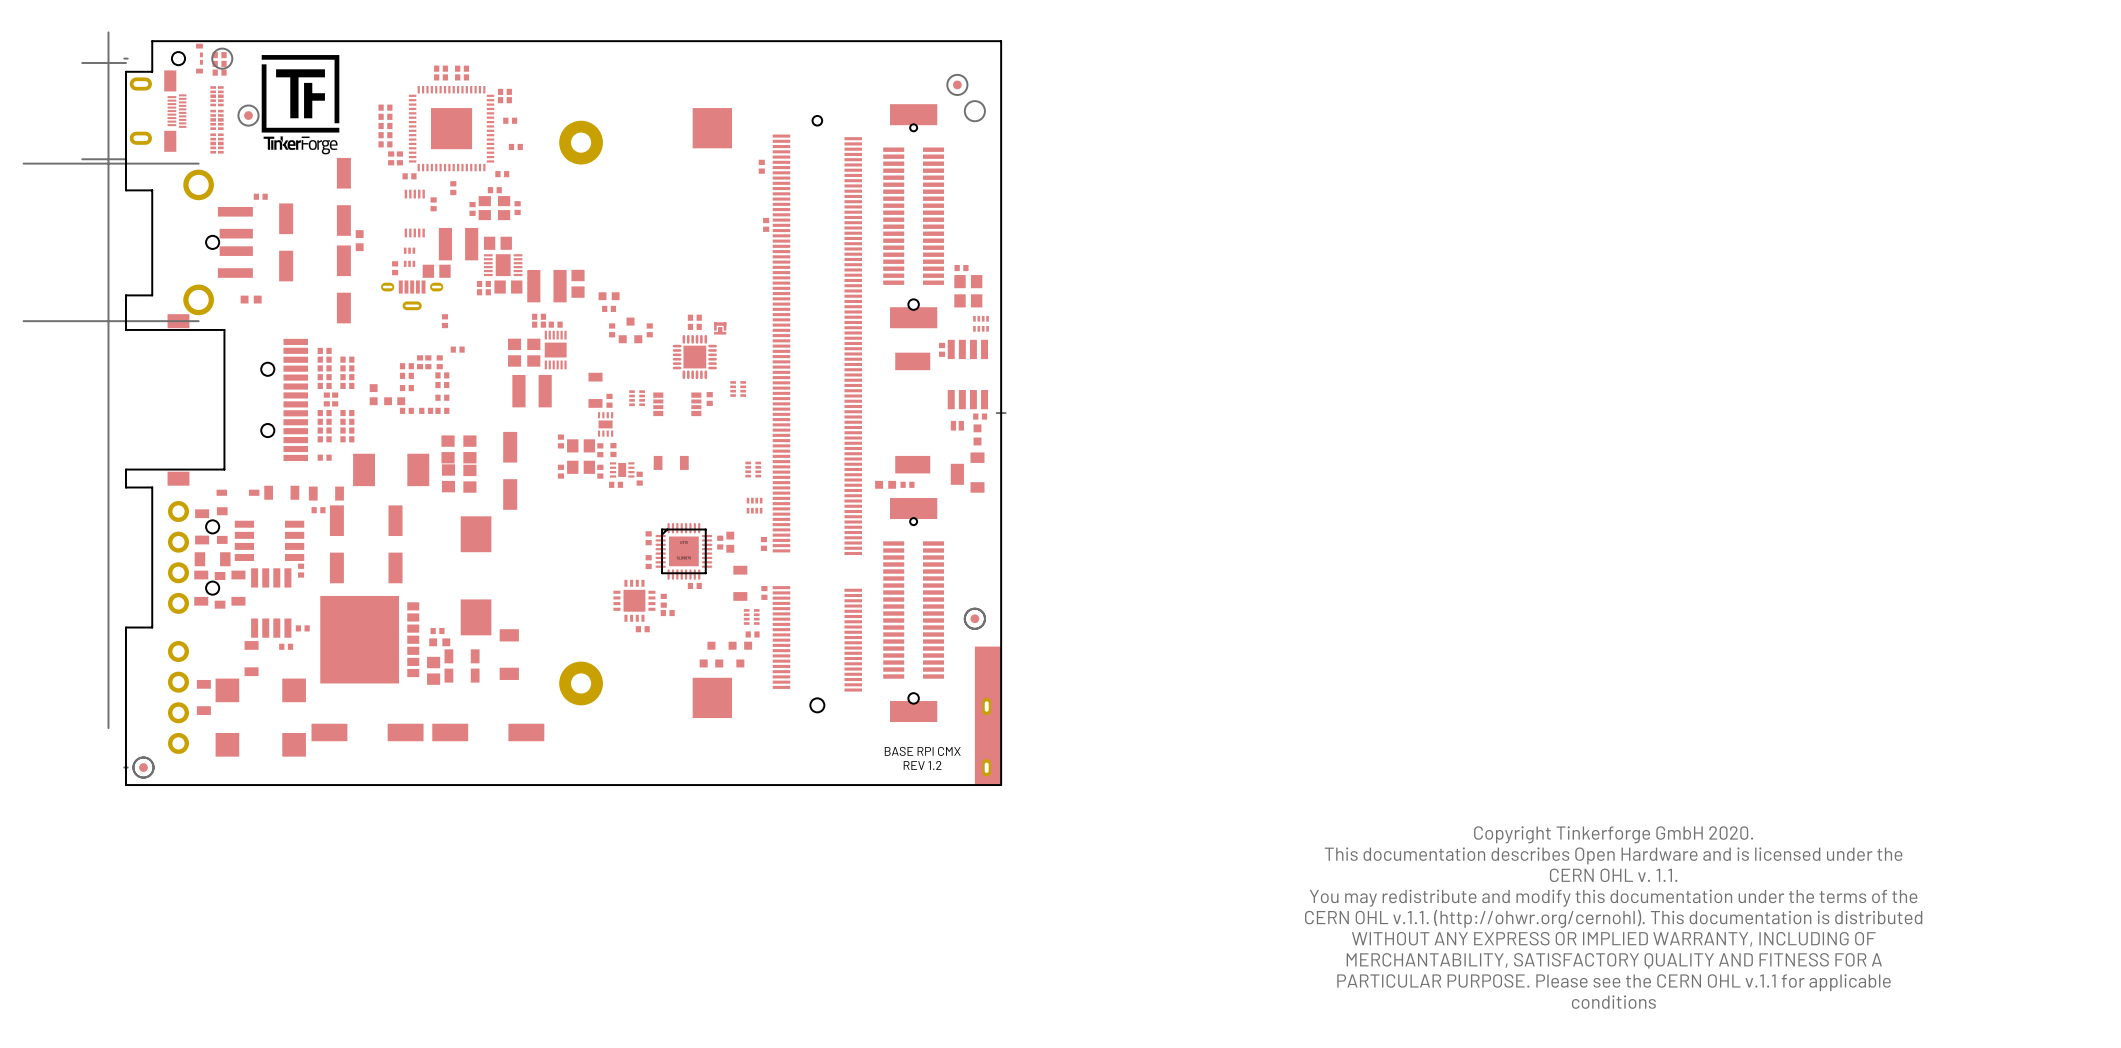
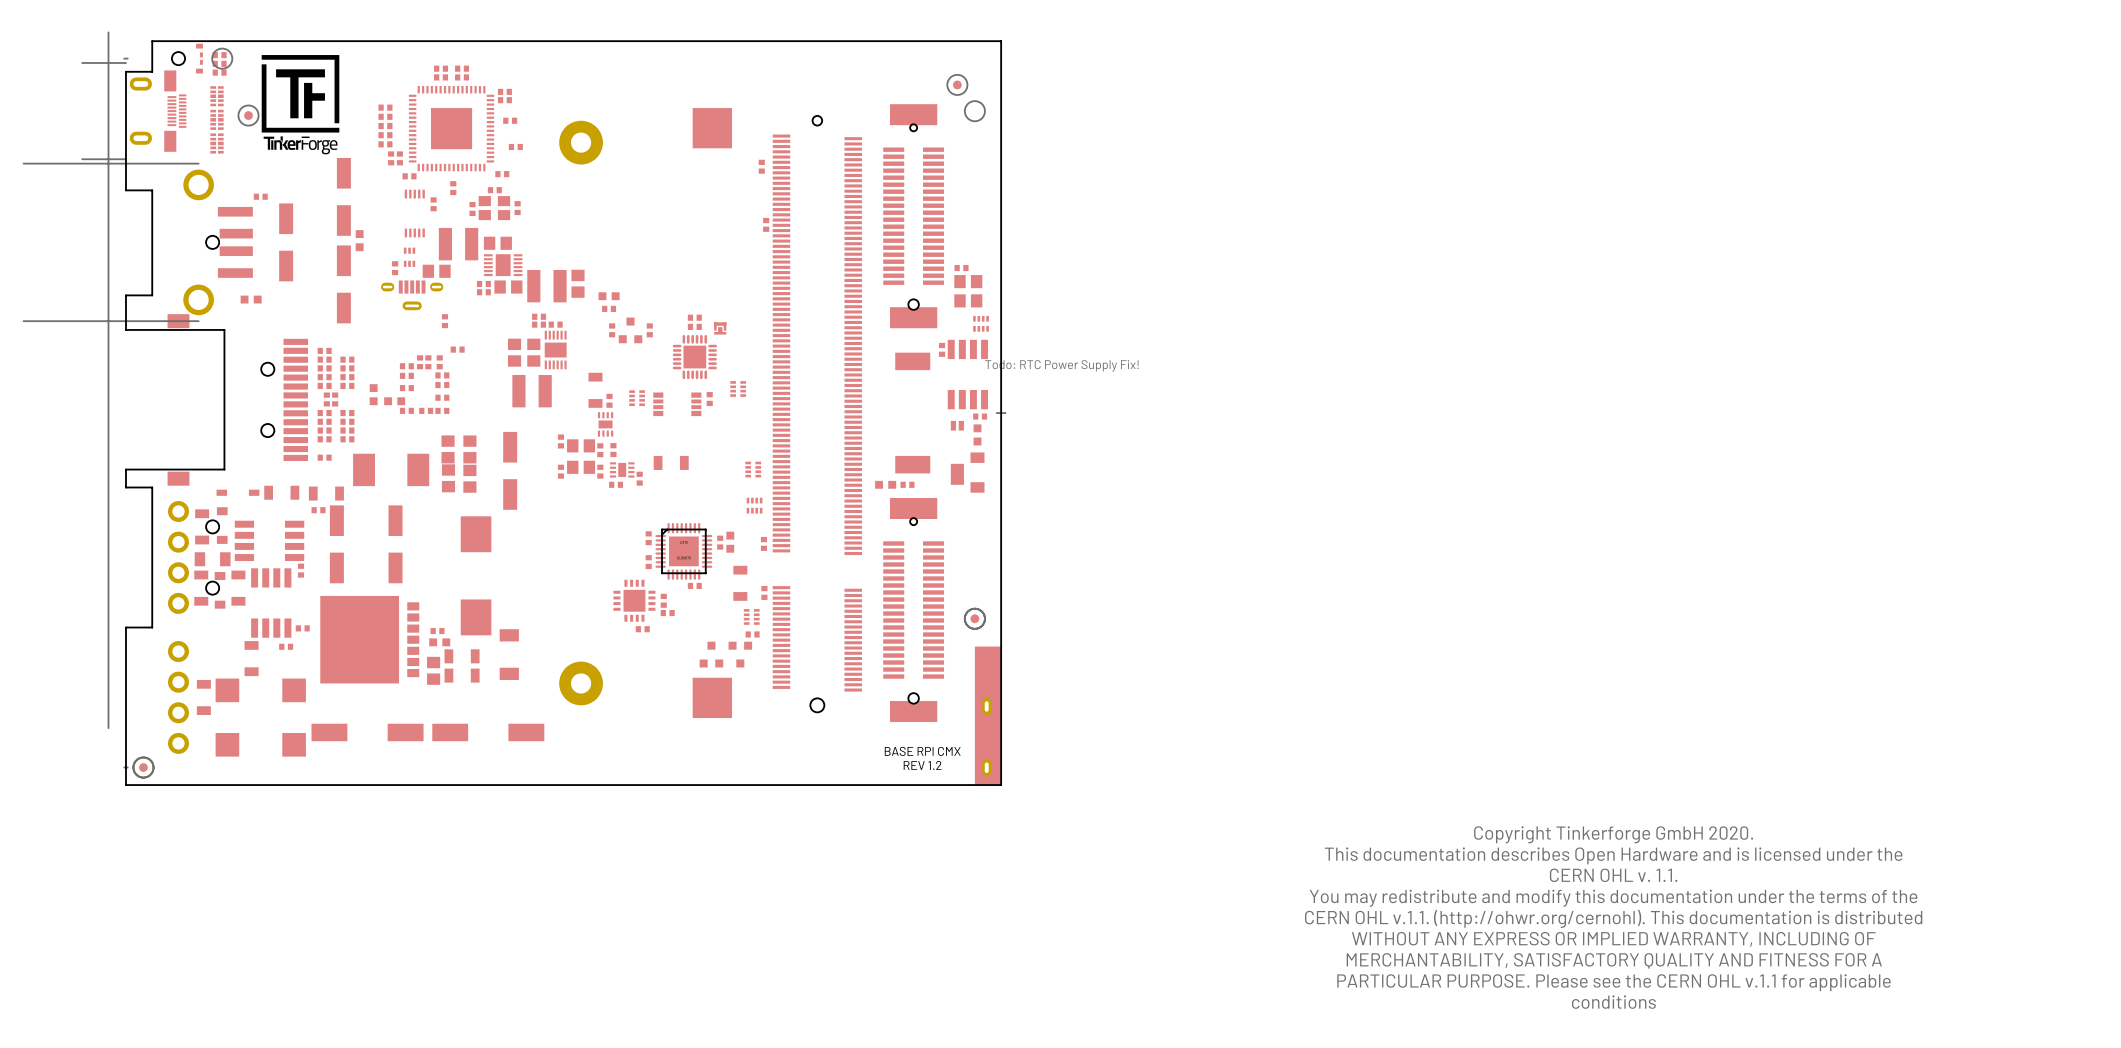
text: none -> Todo: RTC Power Supply Fix! (1062, 365)

